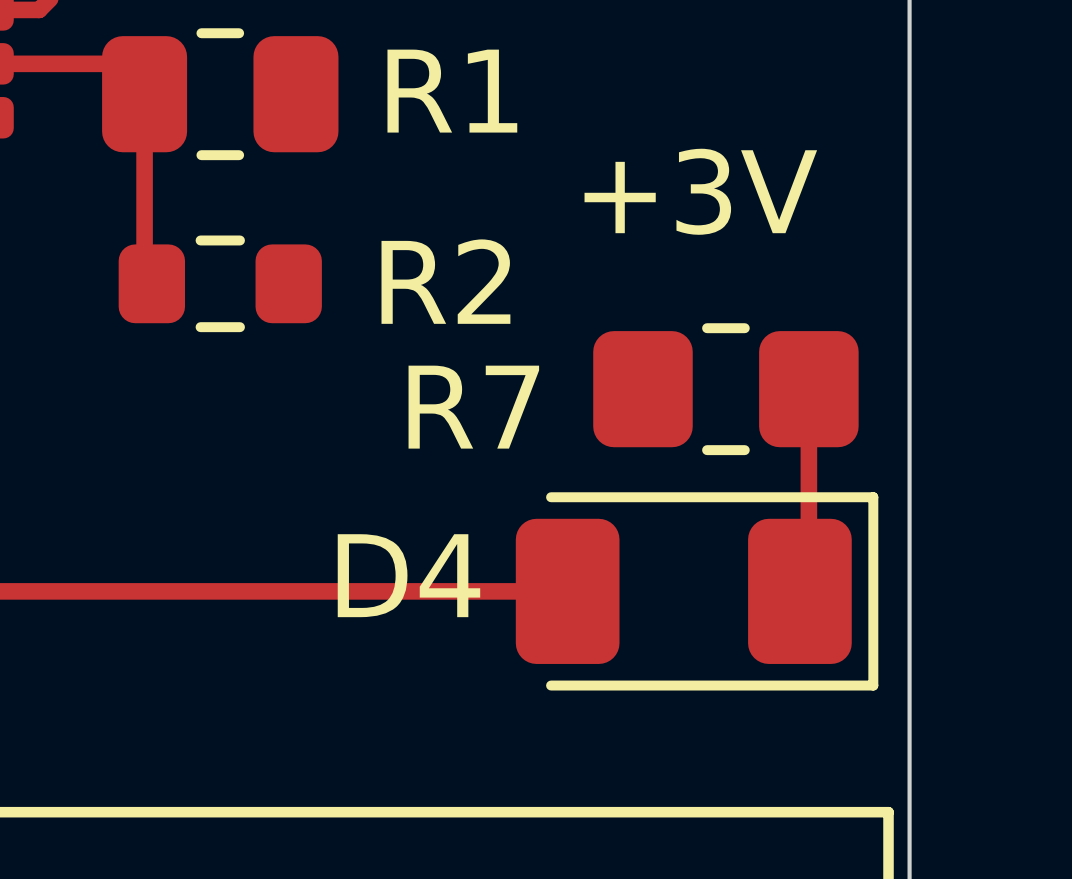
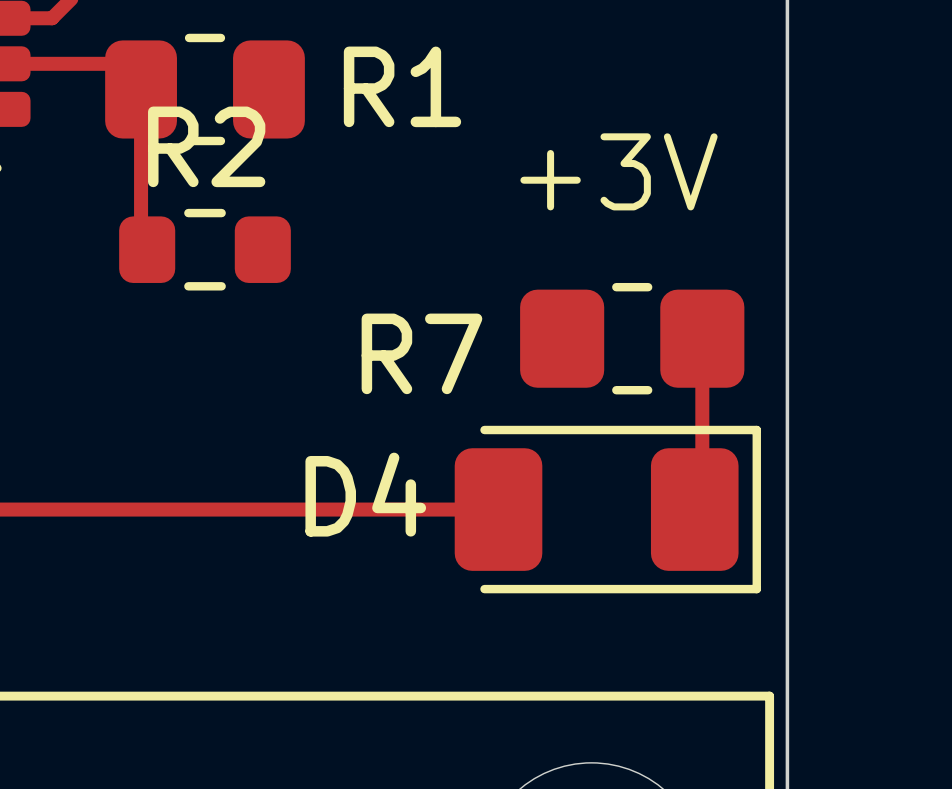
R2 name position: R2 (445, 281) -> R2 (206, 146)

